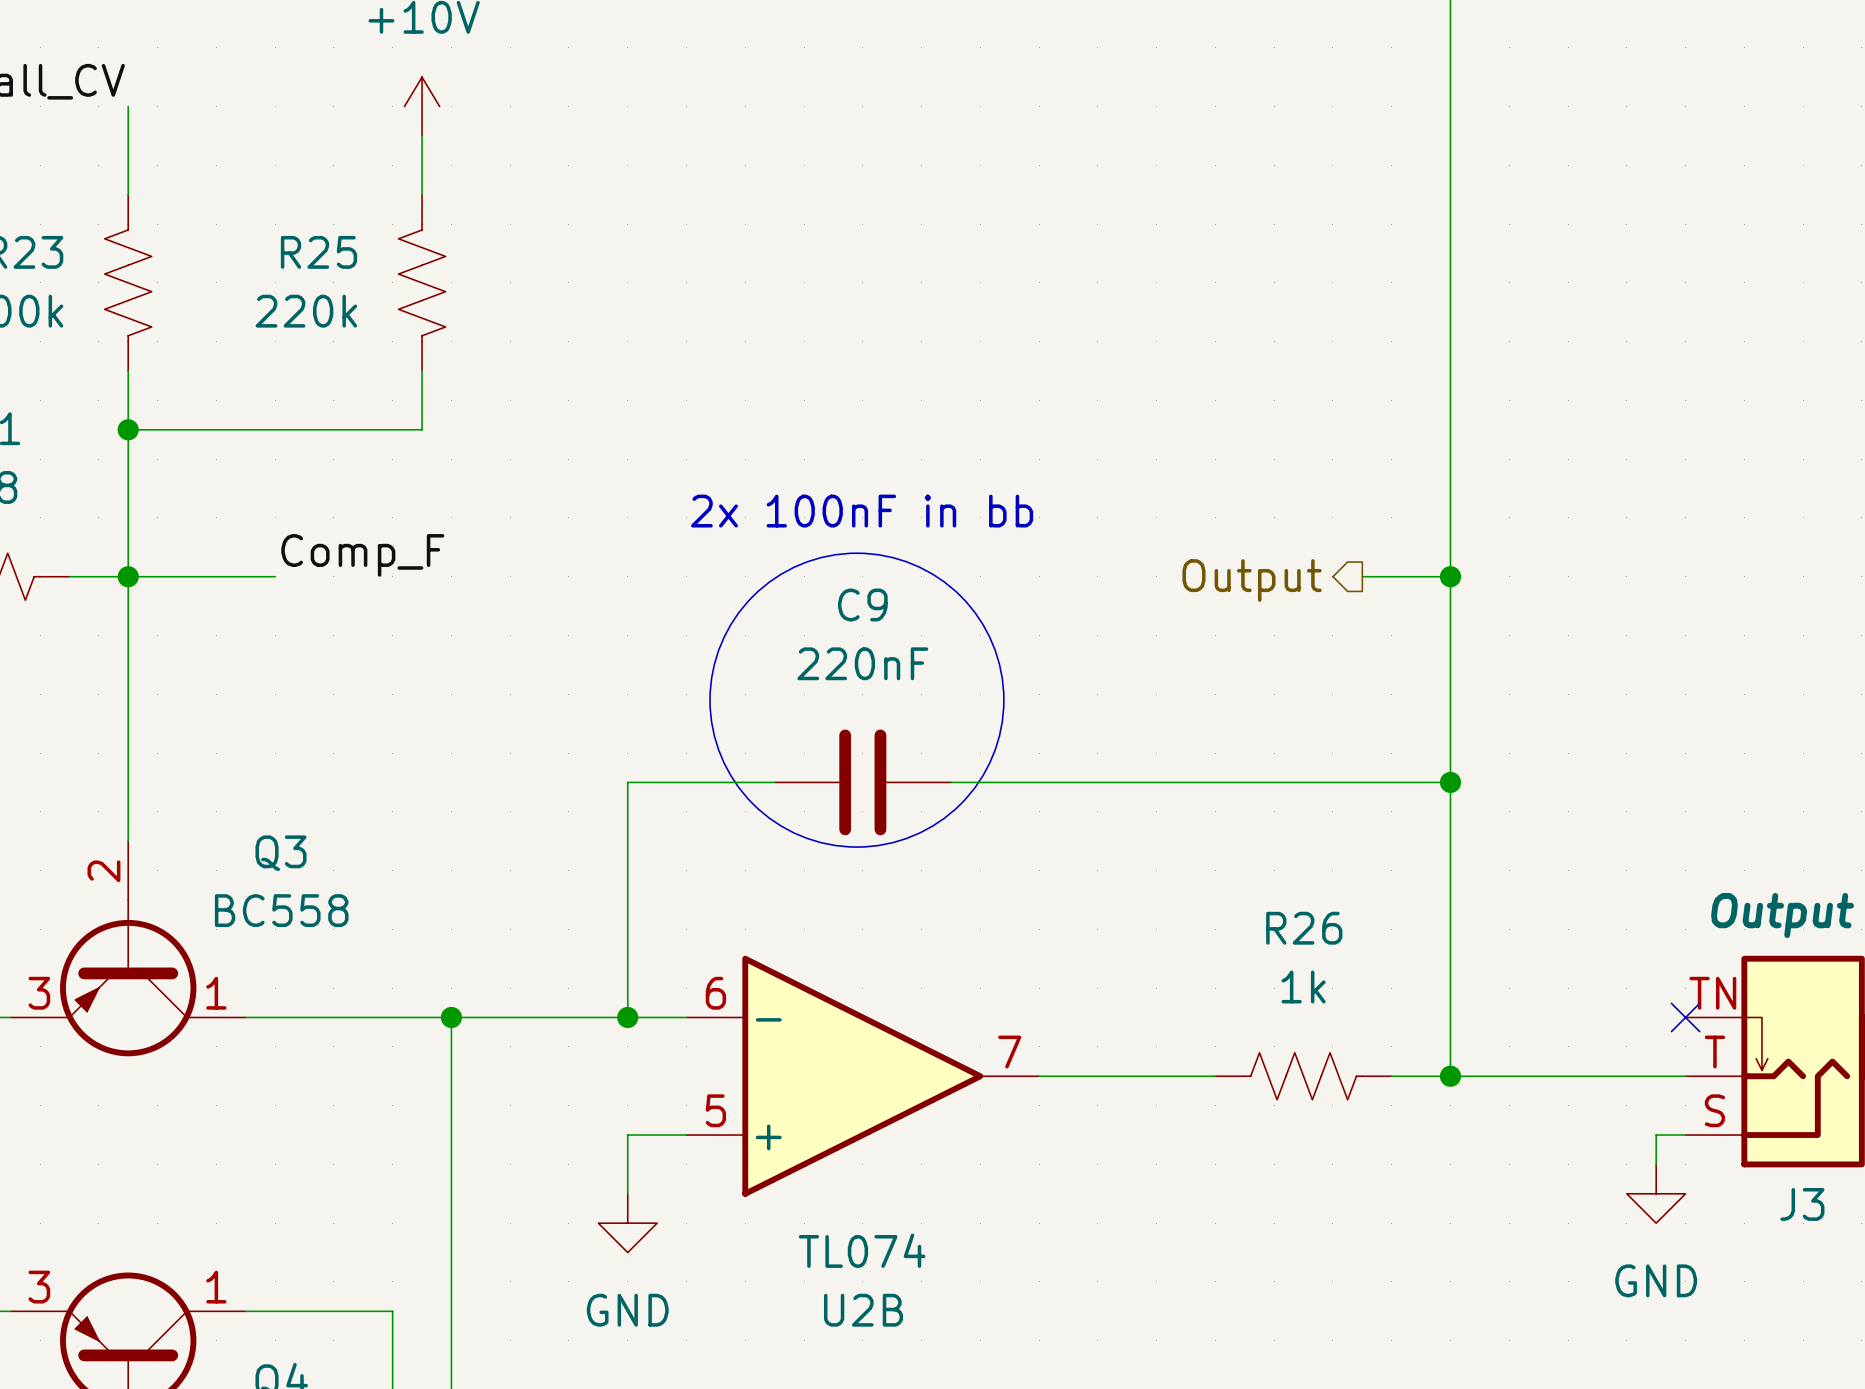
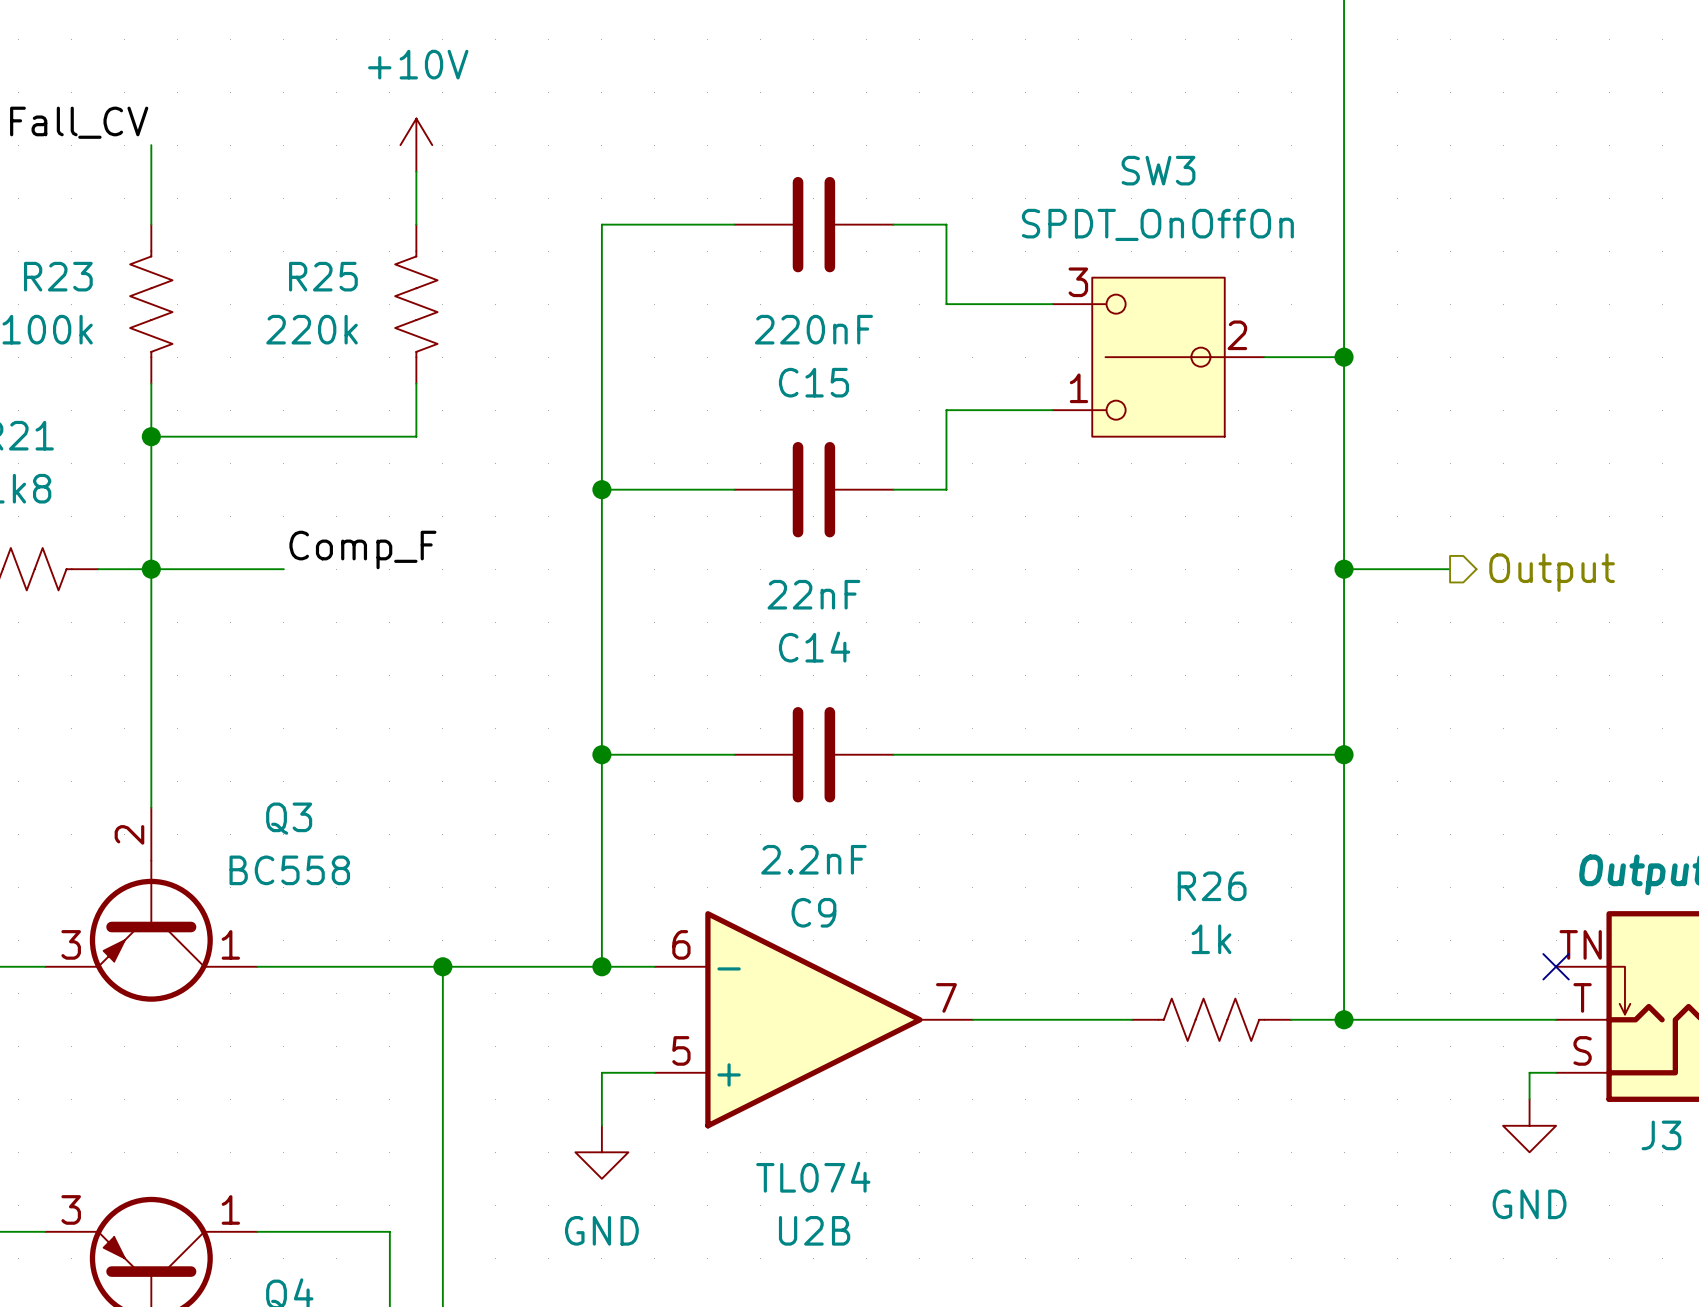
wire: none -> (734, 224) (601, 224) (601, 754)
C15: none -> 220nF (813, 224)
wire: none -> (893, 224) (946, 224) (946, 304) (1052, 304)
SW3: none -> SPDT_OnOffOn (1158, 357)
wire: none -> (1264, 357) (1344, 357)
junction: none -> (1344, 357)
wire: none -> (1052, 410) (946, 410) (946, 489) (893, 489)
wire: none -> (601, 489) (734, 489)
junction: none -> (601, 489)
C14: none -> 22nF (813, 489)
text: 2x 100nF in bb (862, 511) -> none
drawing: [710, 553, 1004, 848] -> none
wire: (1362, 576) (1450, 576) -> (1450, 569) (1344, 569)
hierarchical label rotation: 0° (1252, 580) -> 180° (1552, 572)
hierarchical label position: Output (1252, 580) -> Output (1552, 572)
C9 name position: C9 (862, 605) -> C9 (813, 912)
C9 value: 220nF (862, 663) -> 2.2nF (813, 859)
junction: none -> (601, 754)

